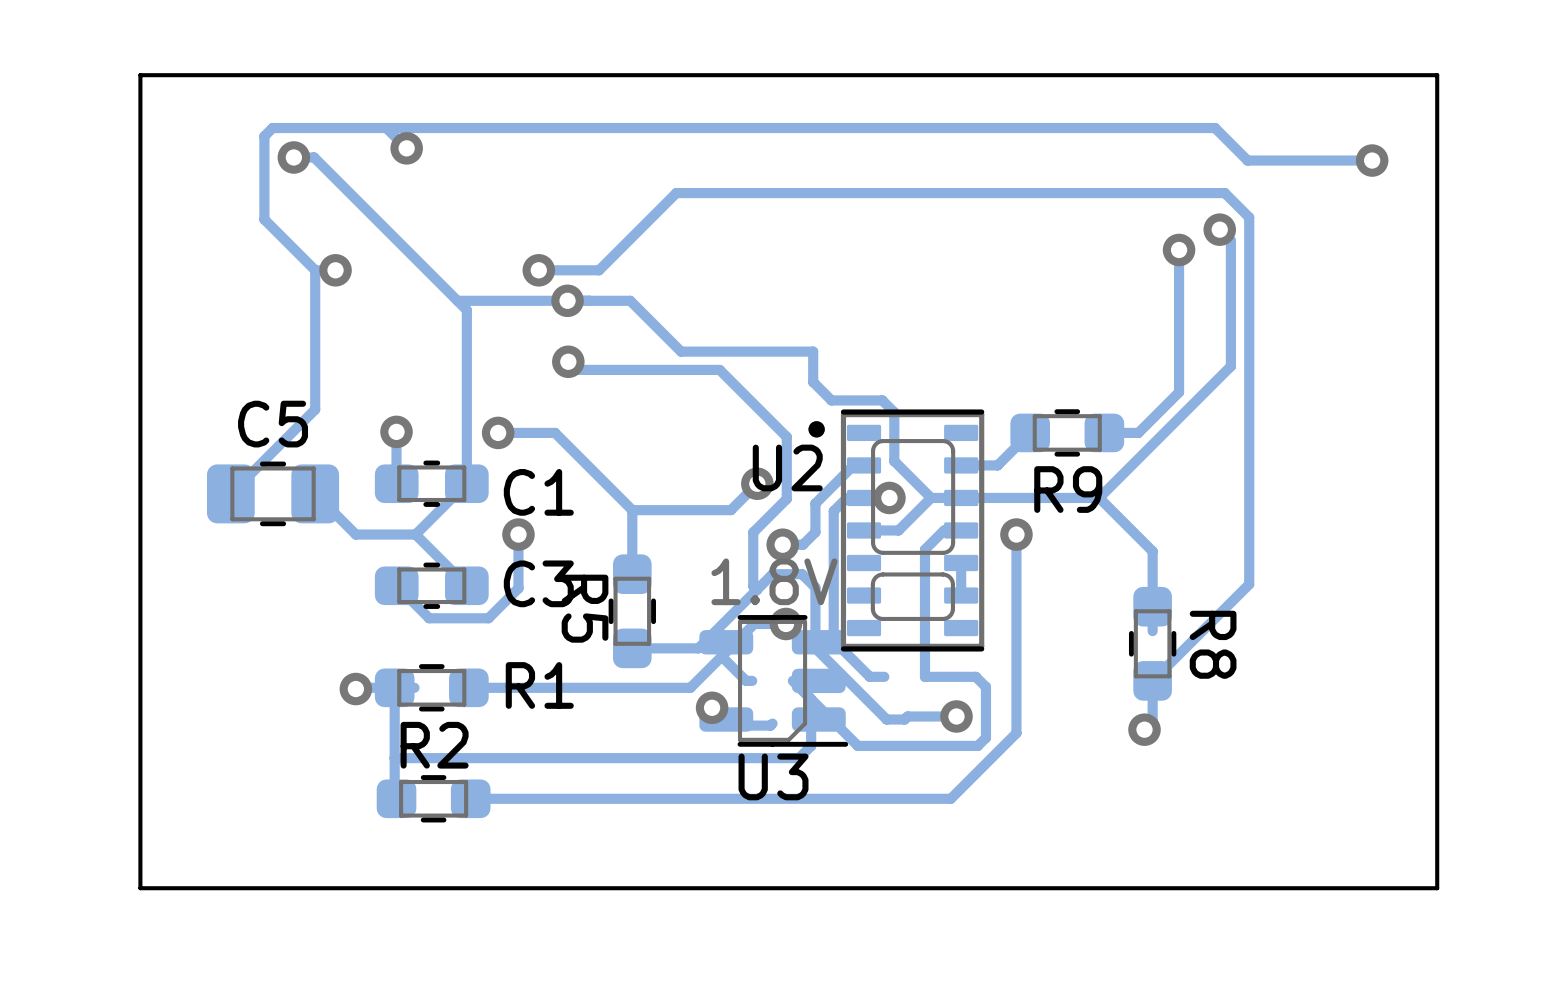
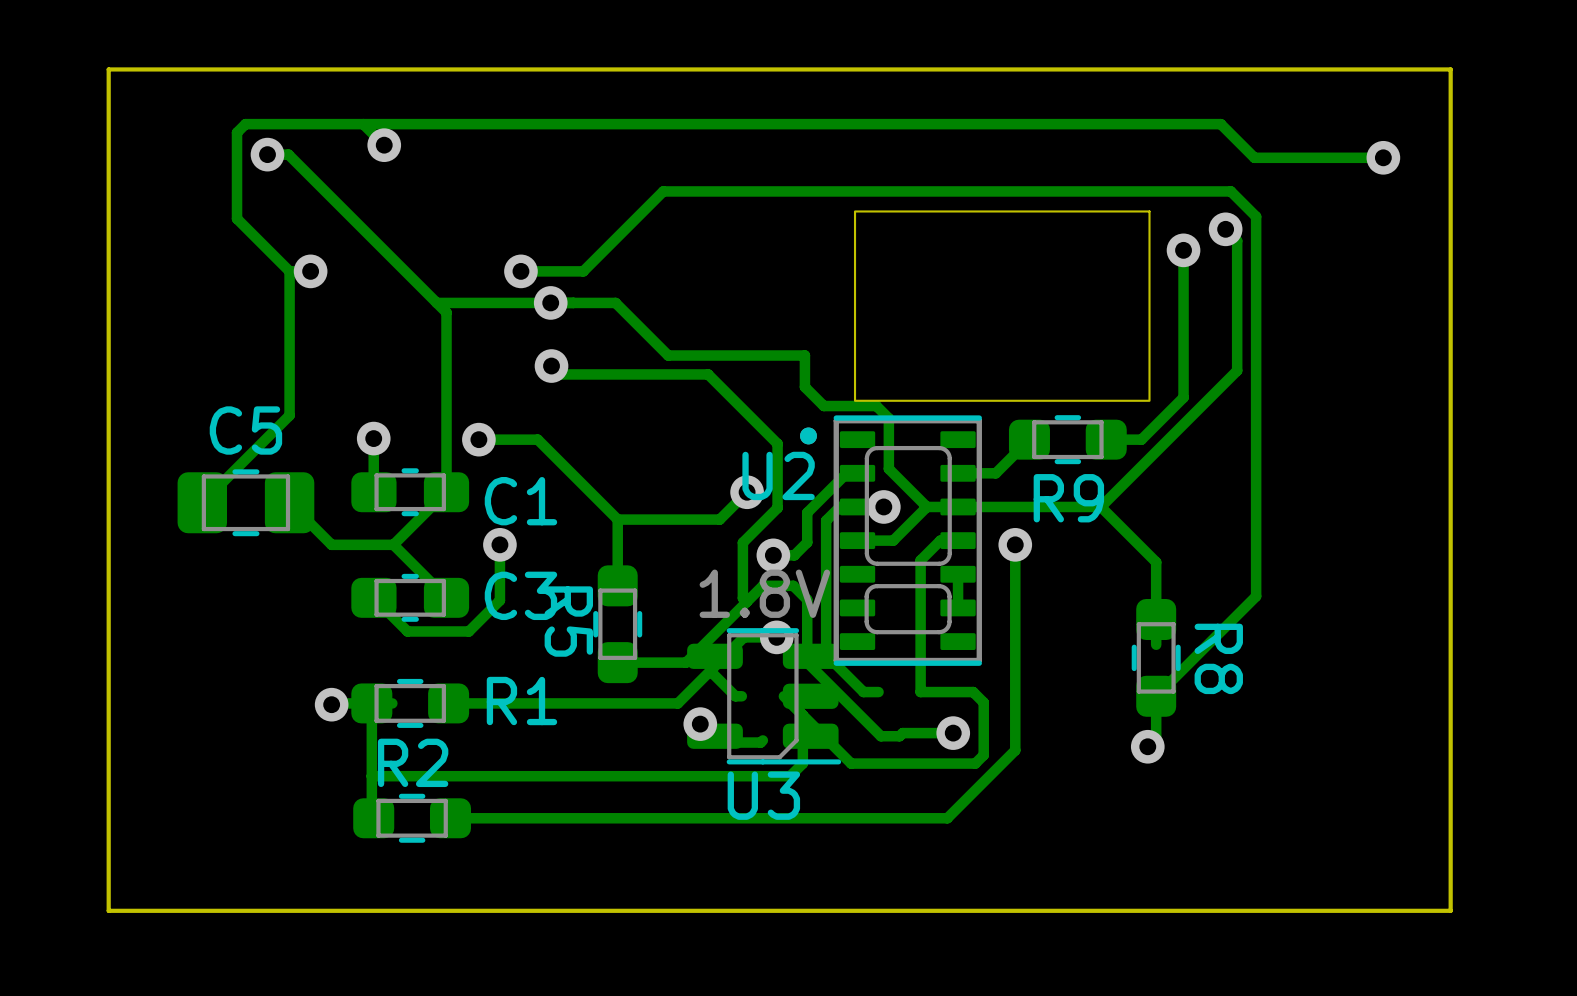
part: none -> (1002, 306)

